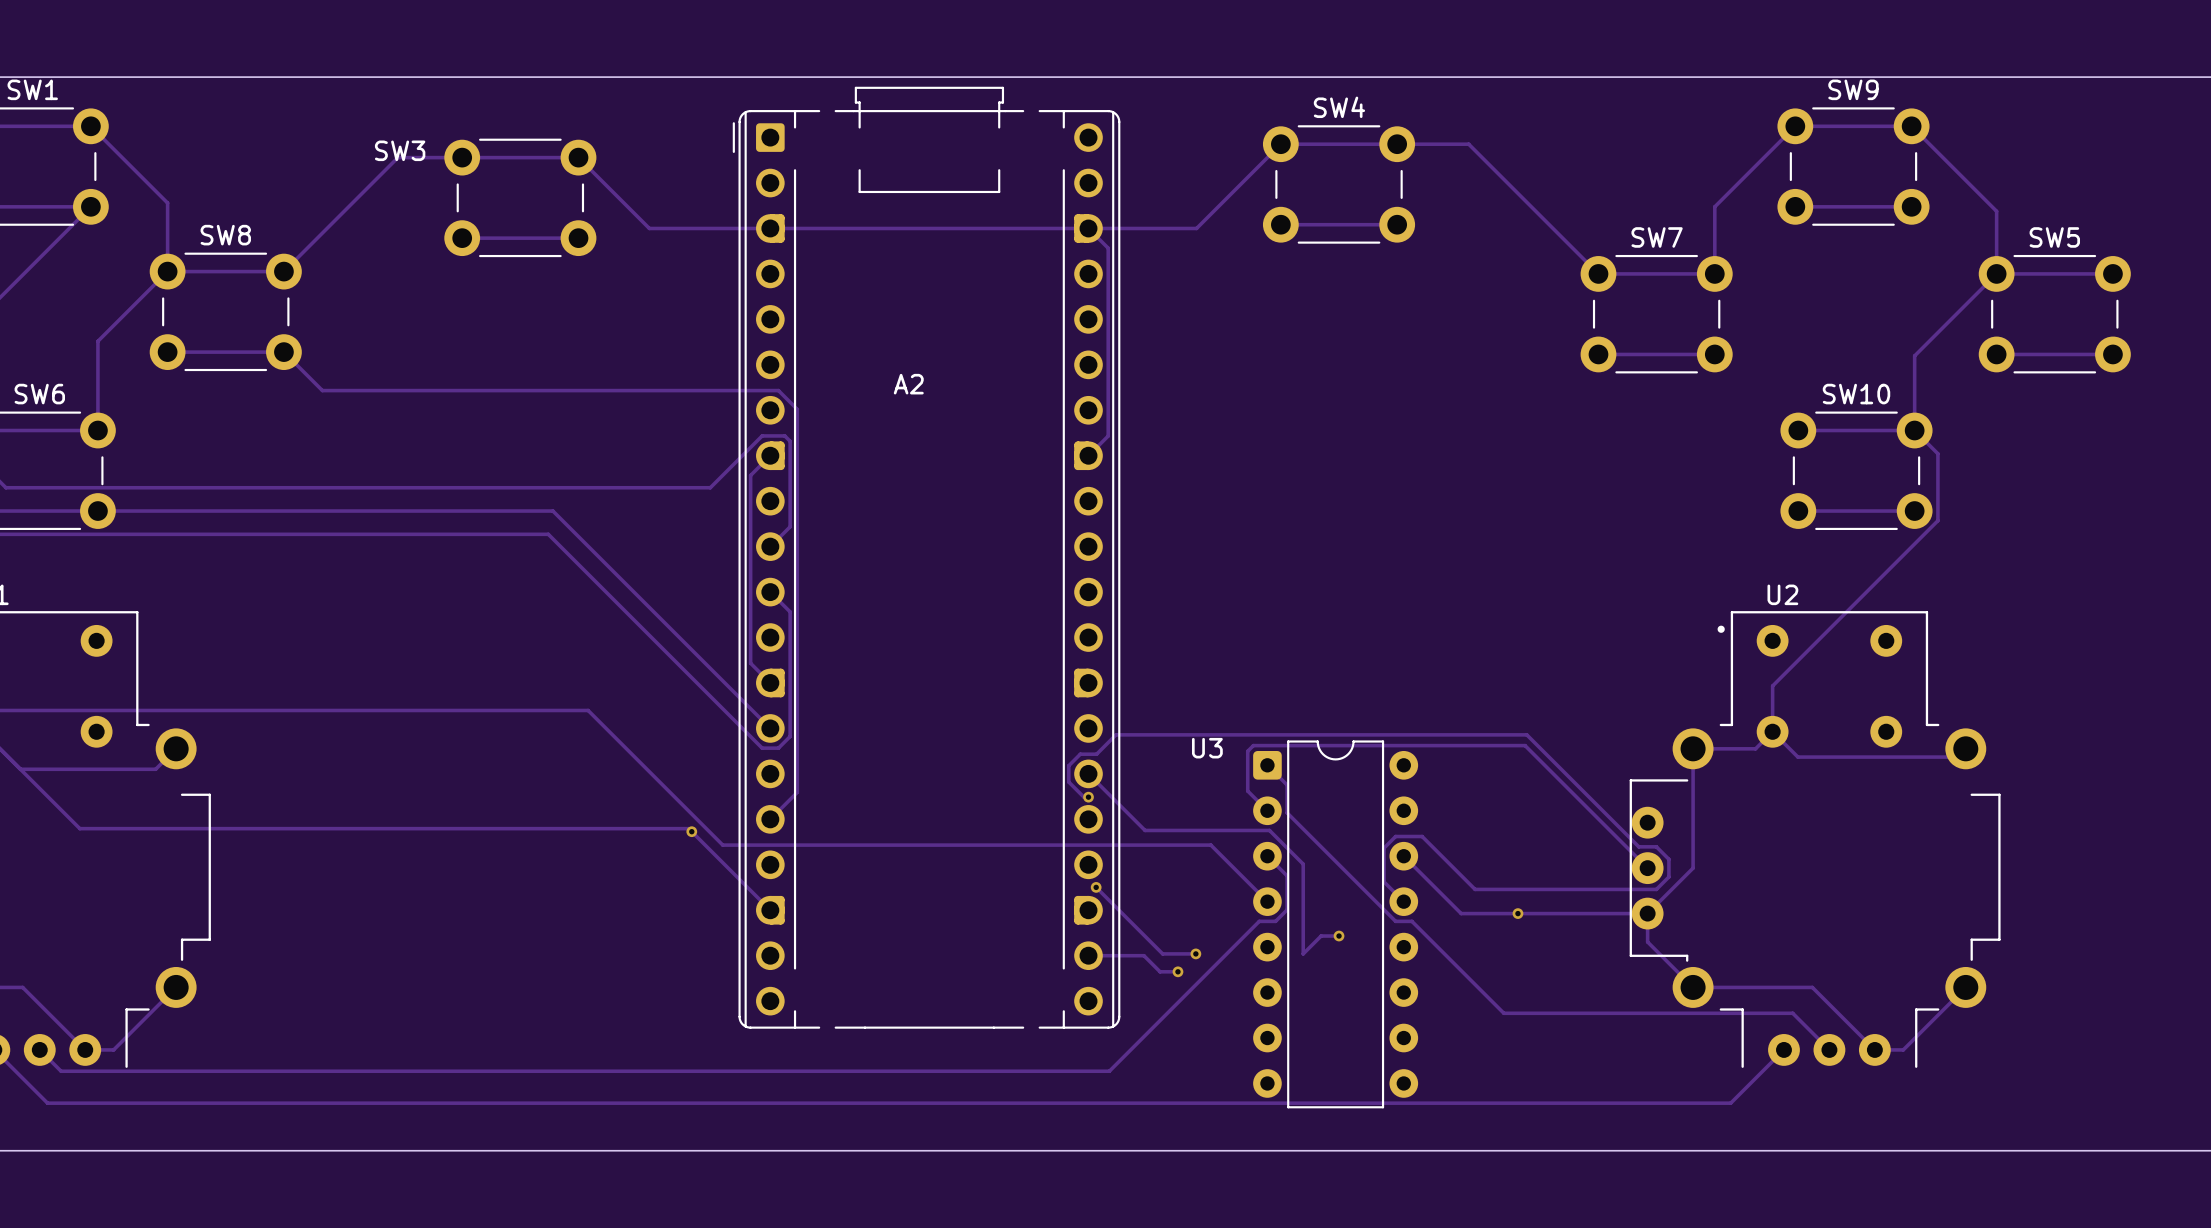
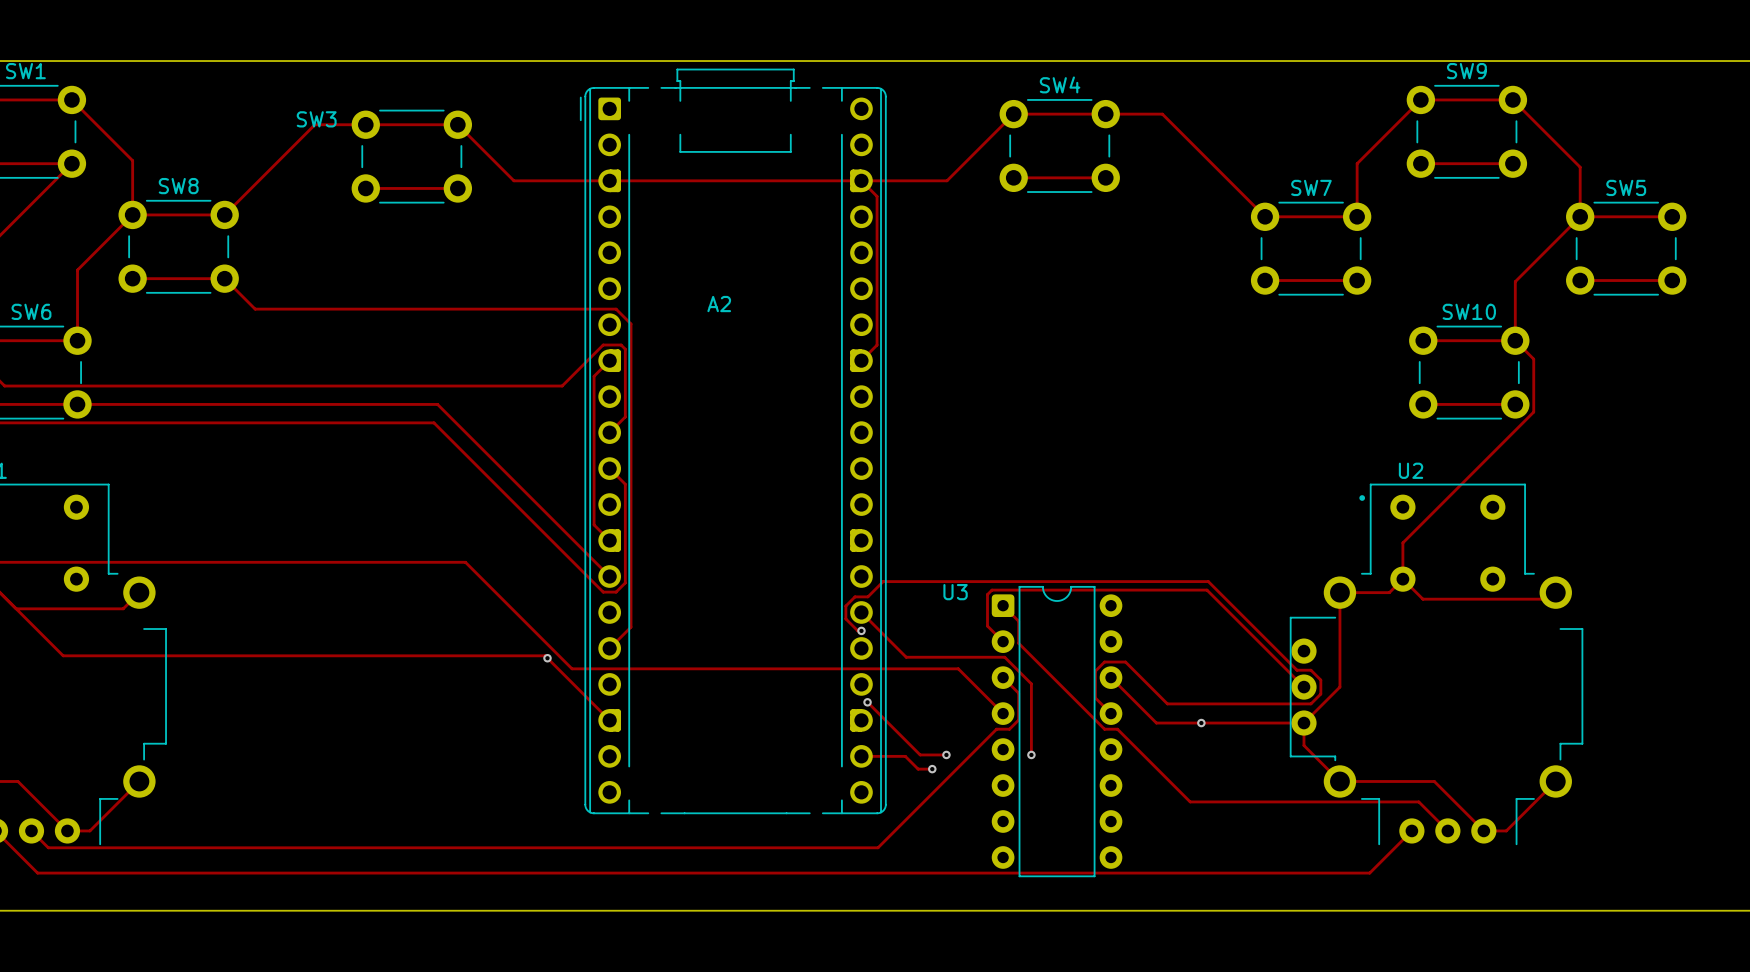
track: (1339, 936) (1321, 936) (1303, 953) -> none
via position: (1339, 936) -> (1031, 754)

